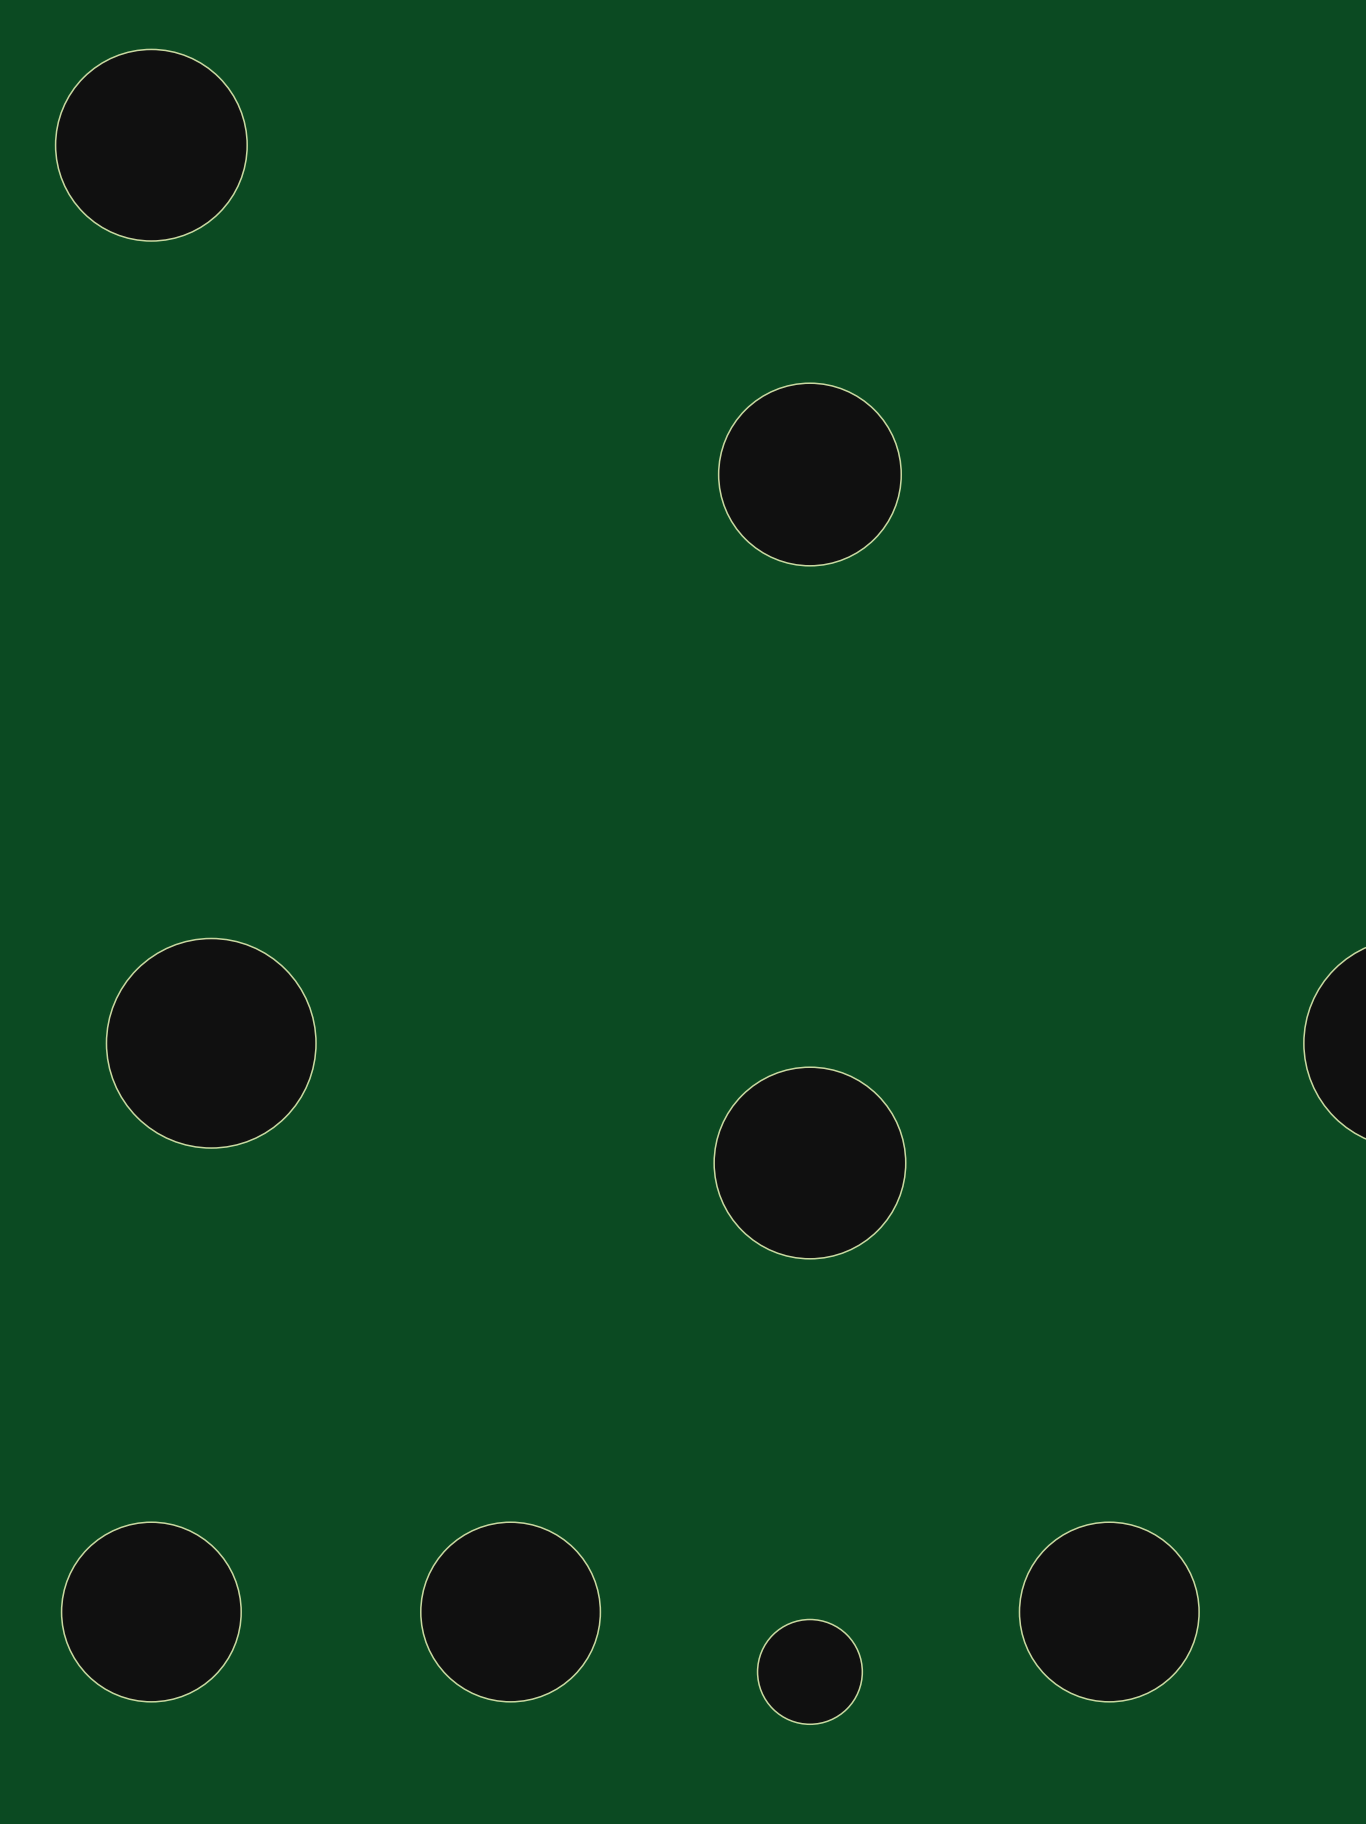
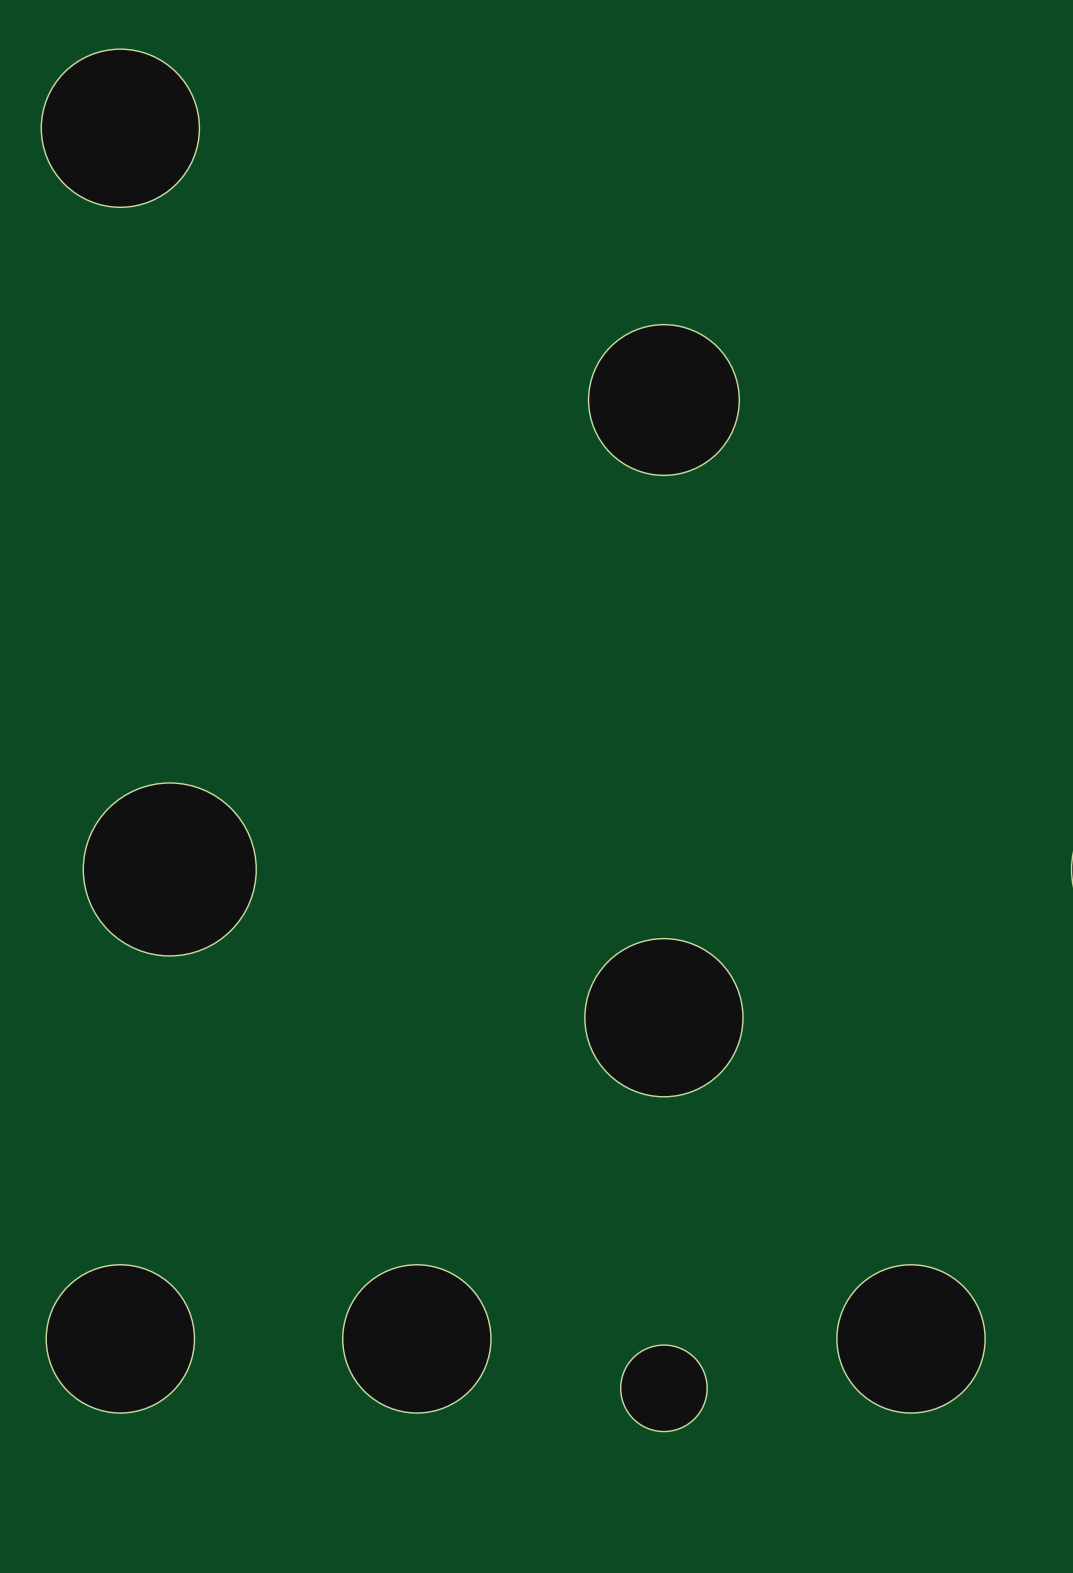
part position: (809, 1163) -> (663, 1017)

